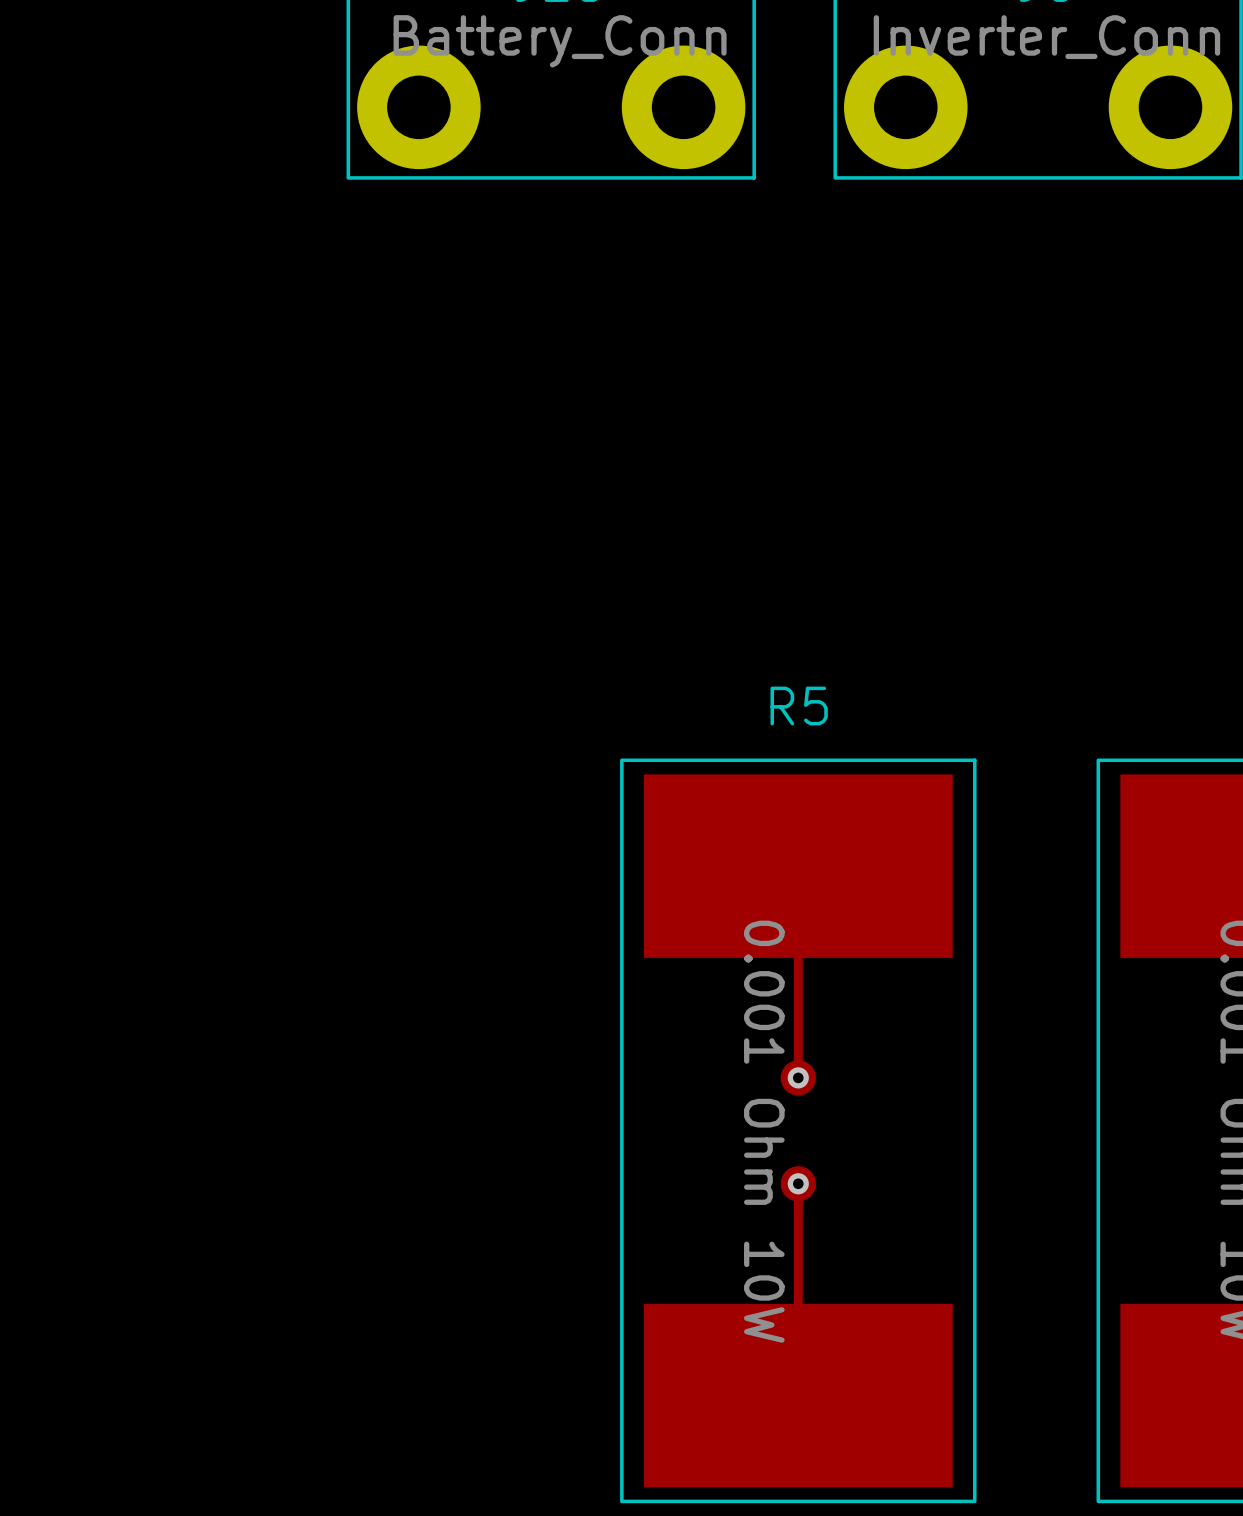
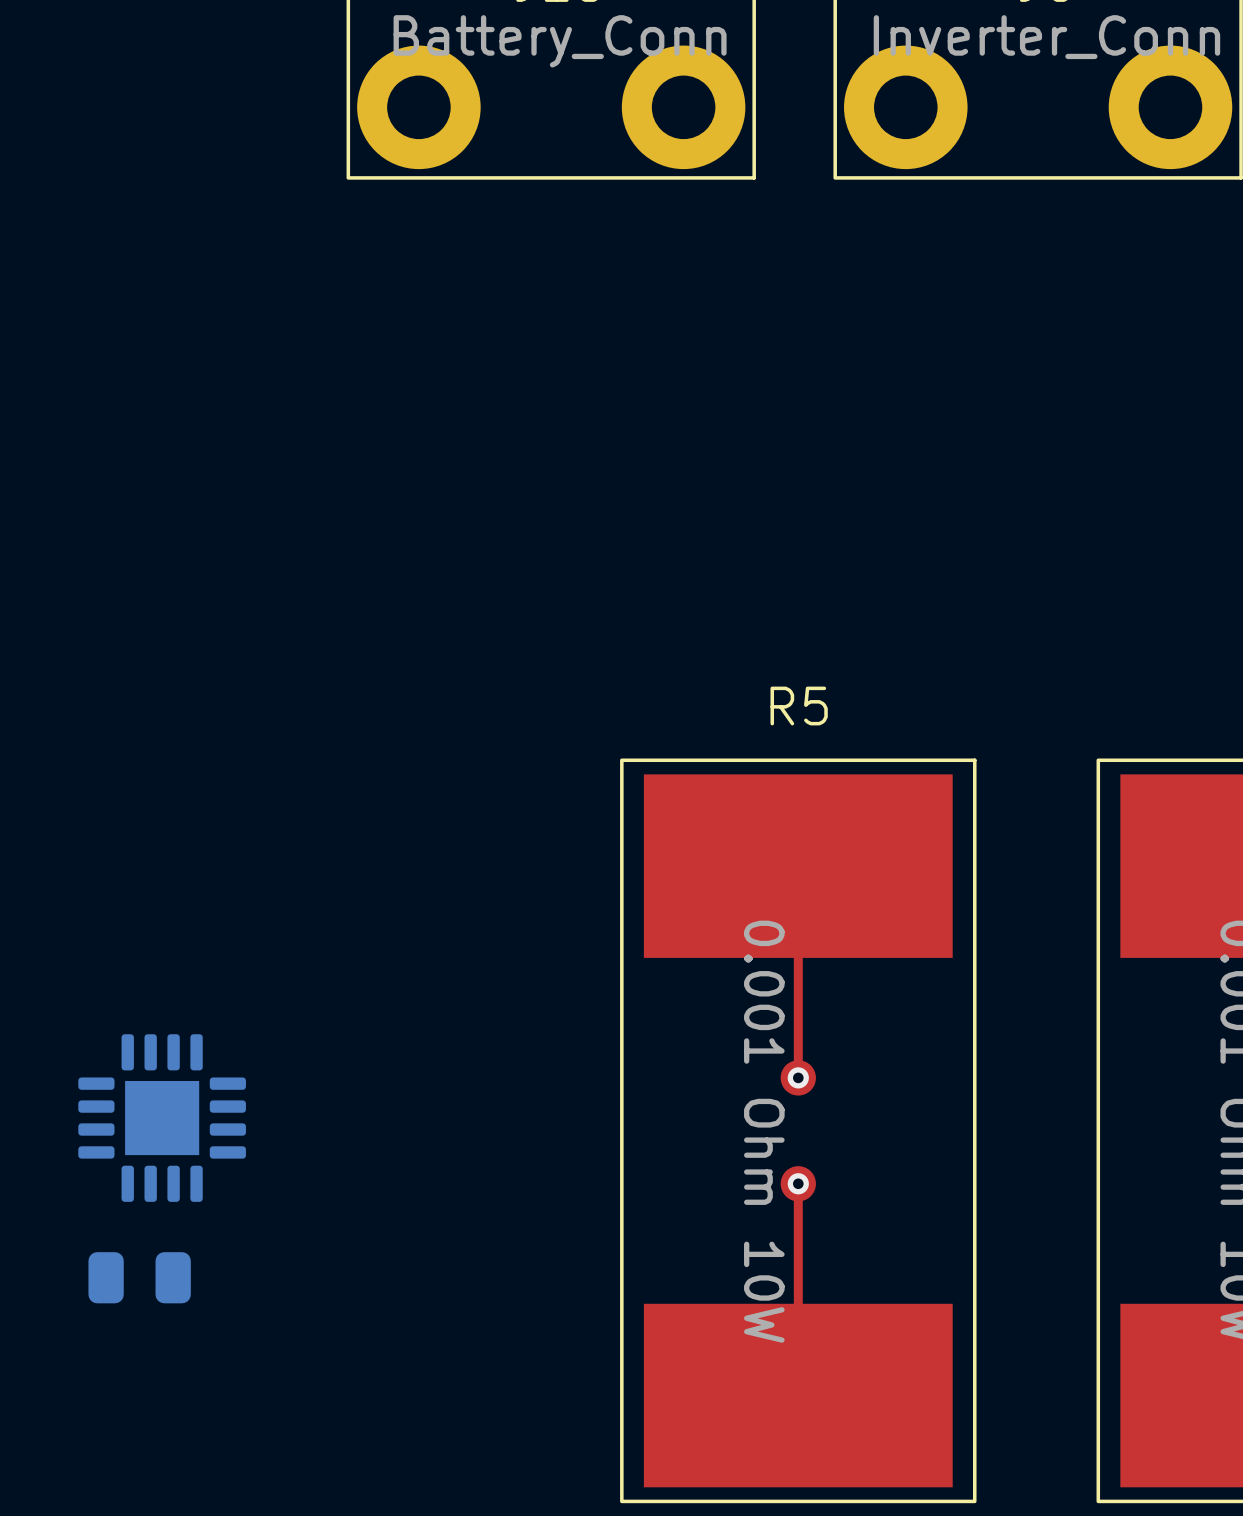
part: none -> (162, 1118)
part: none -> (139, 1277)

